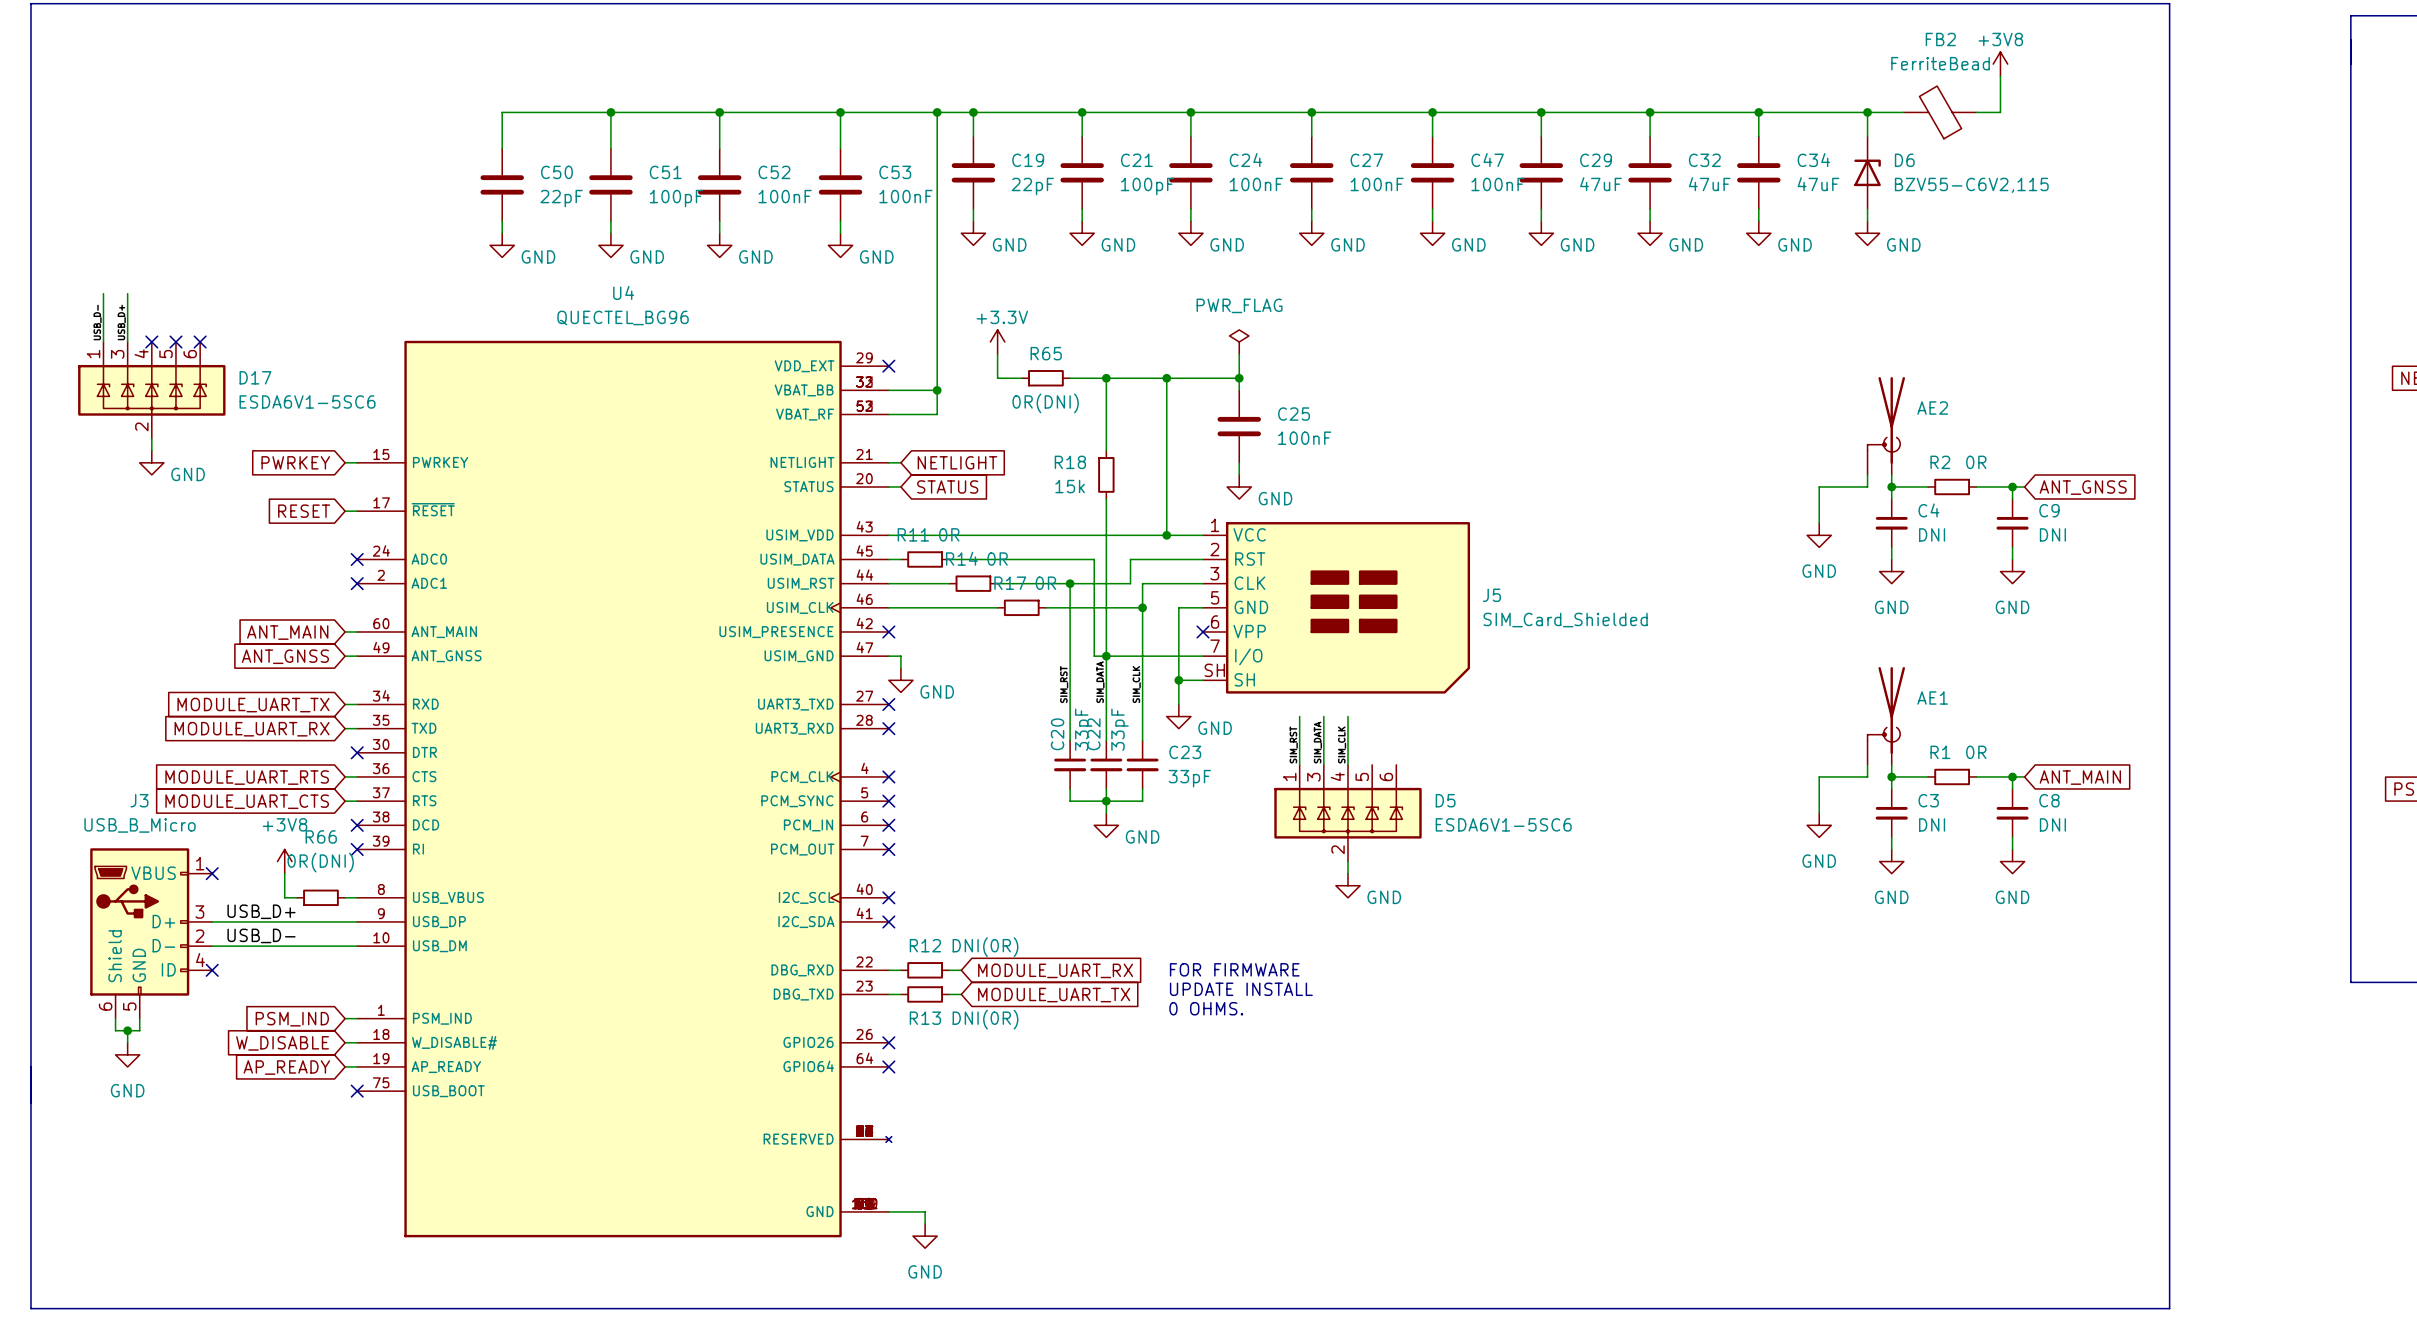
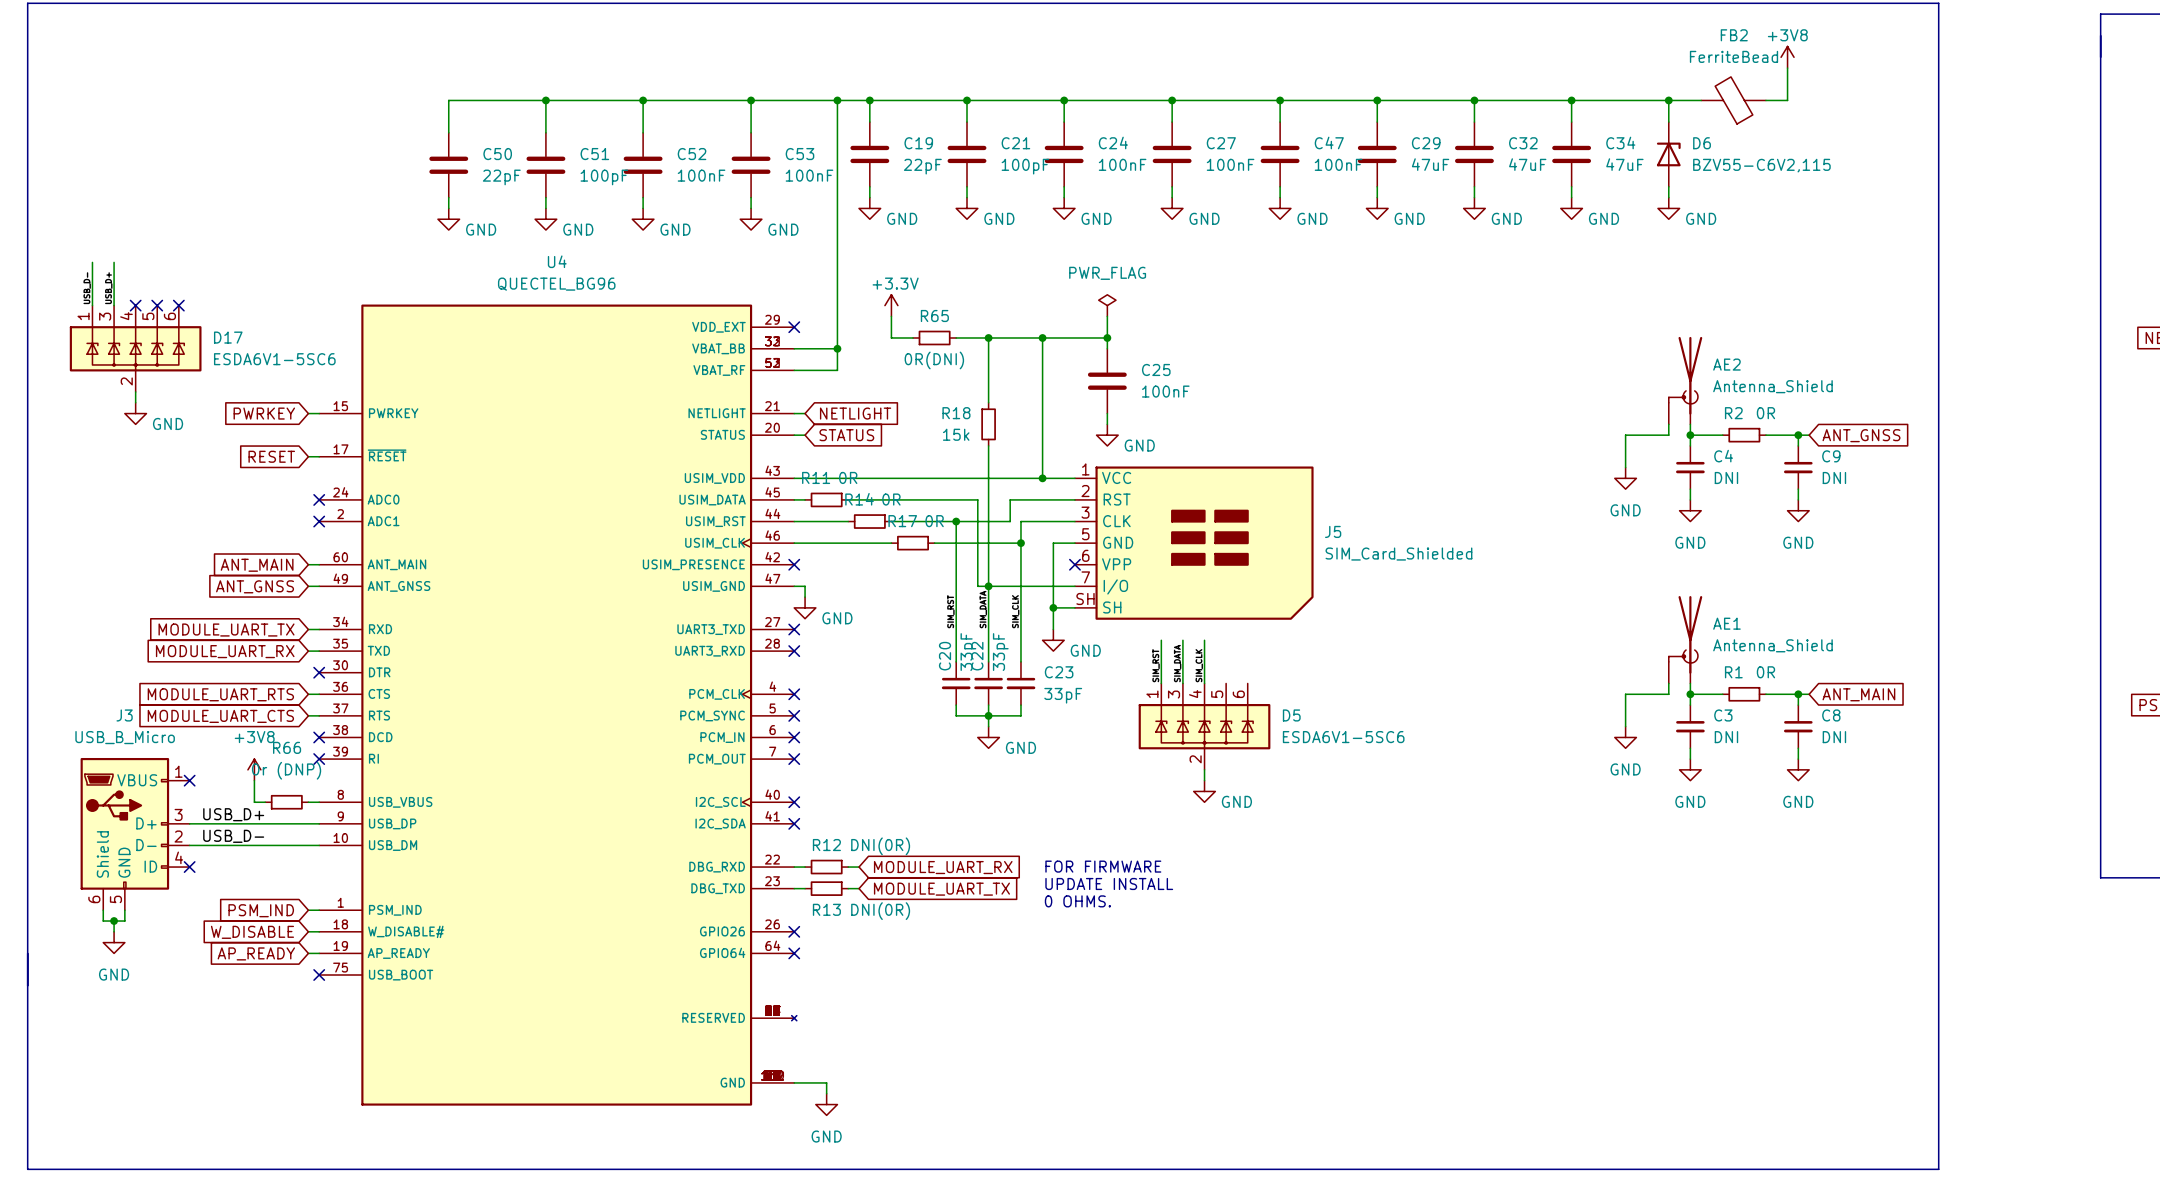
AE2 value: none -> Antenna_Shield (1772, 386)
AE1 value: none -> Antenna_Shield (1772, 645)
R66 value: 0R(DNI) (320, 862) -> 0r (DNP) (286, 770)

